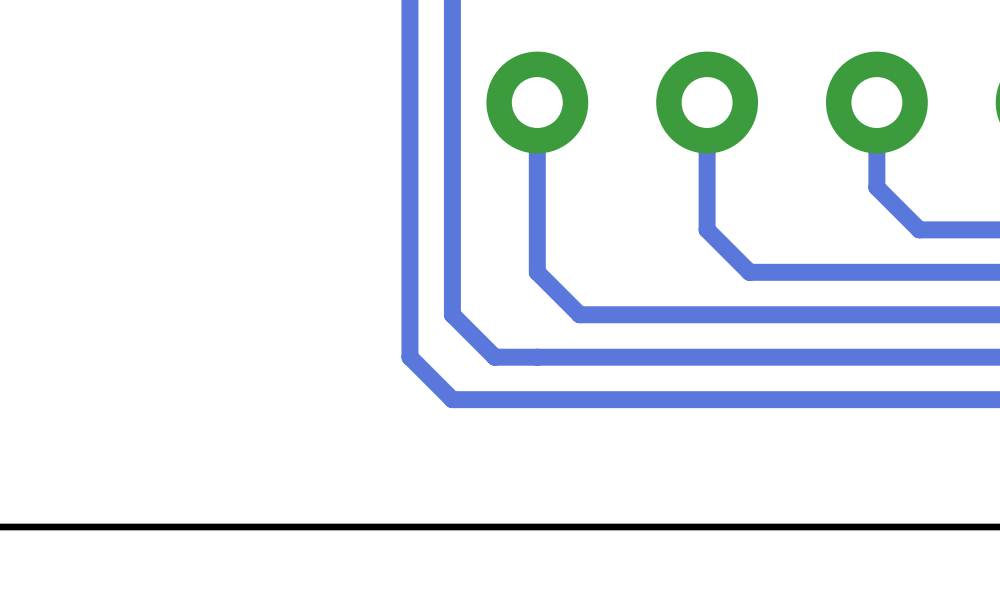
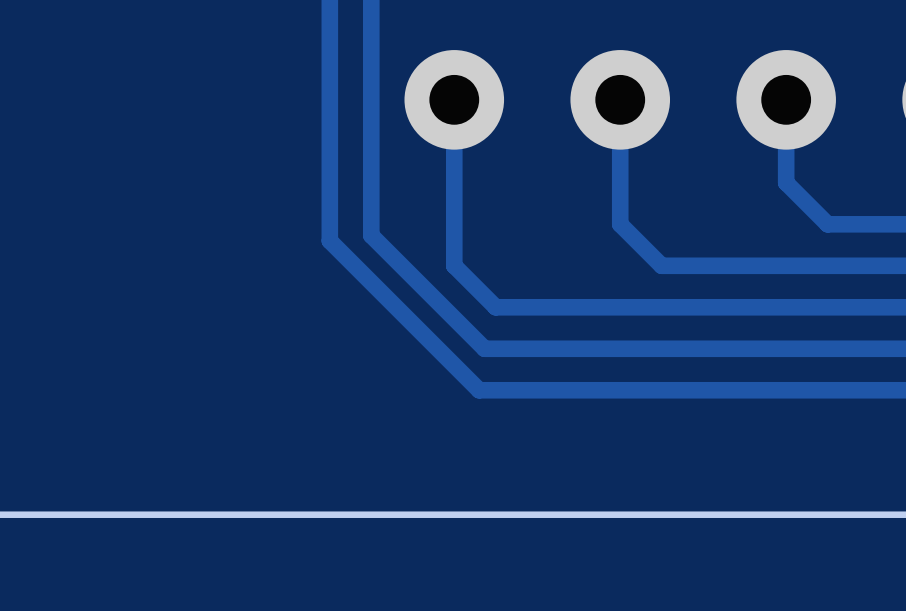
track: (452, 241) (452, 314) (494, 357) (568, 357) -> (371, 235) (484, 348)
track: (409, 246) (409, 357) (452, 399) (562, 399) -> (329, 240) (479, 390)

